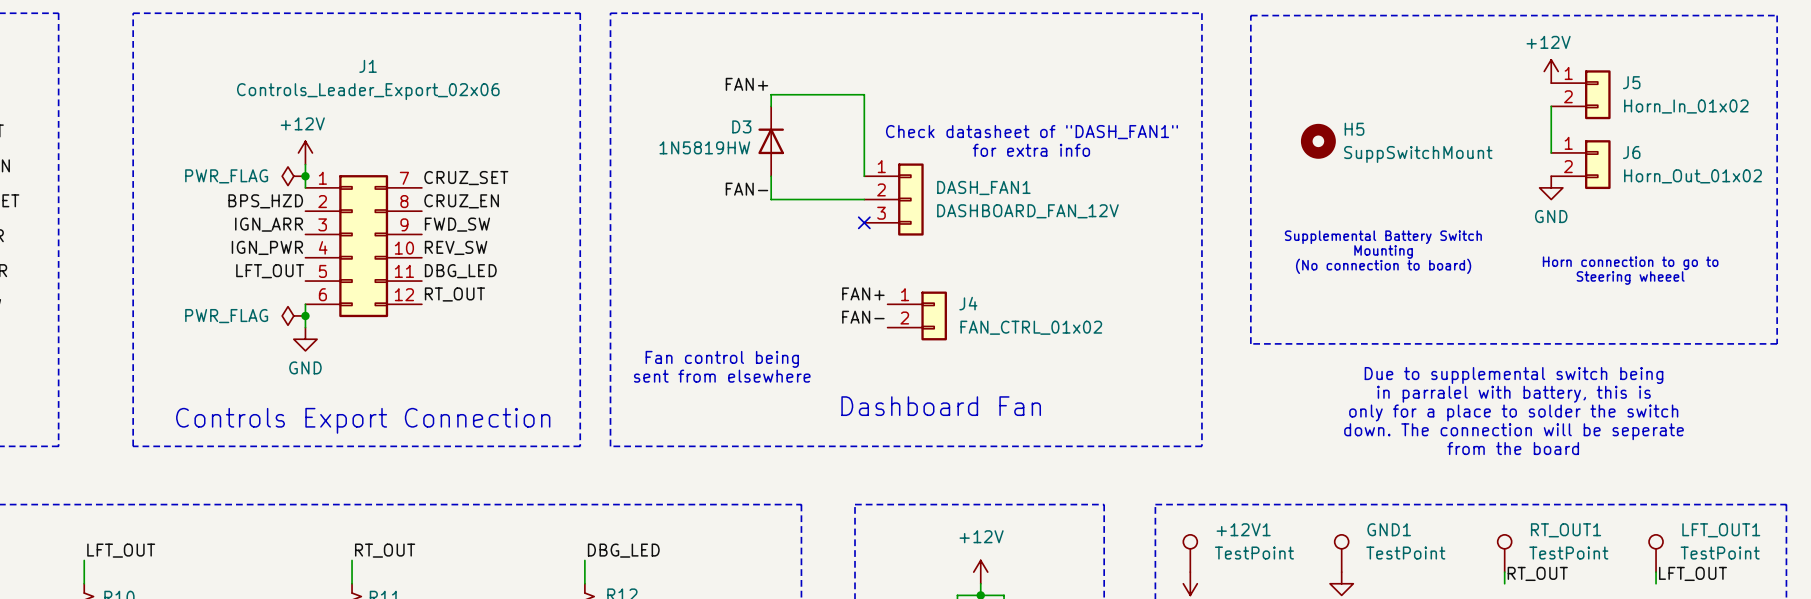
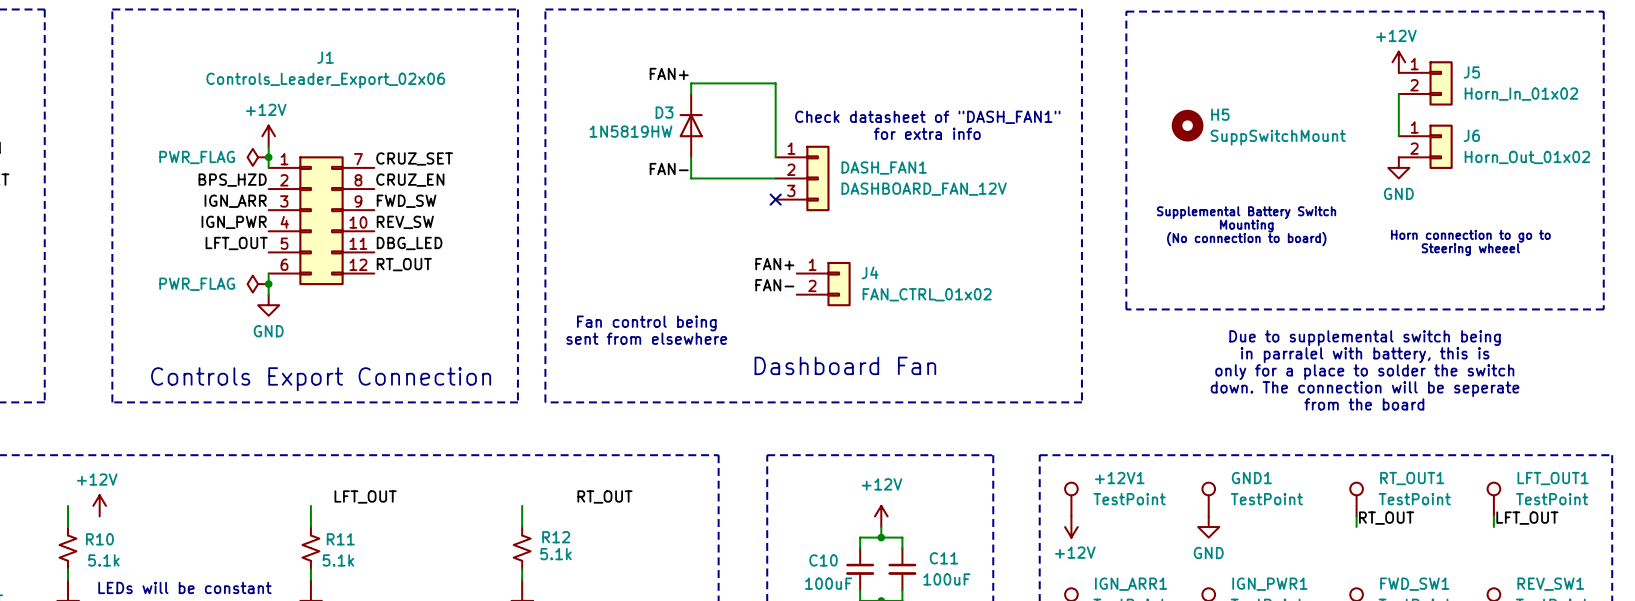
label: LFT_OUT (121, 550) -> none
label: RT_OUT (385, 550) -> LFT_OUT (365, 496)
label: DBG_LED (623, 550) -> none
label: none -> RT_OUT (604, 496)
power symbol: none -> +12V (99, 505)

